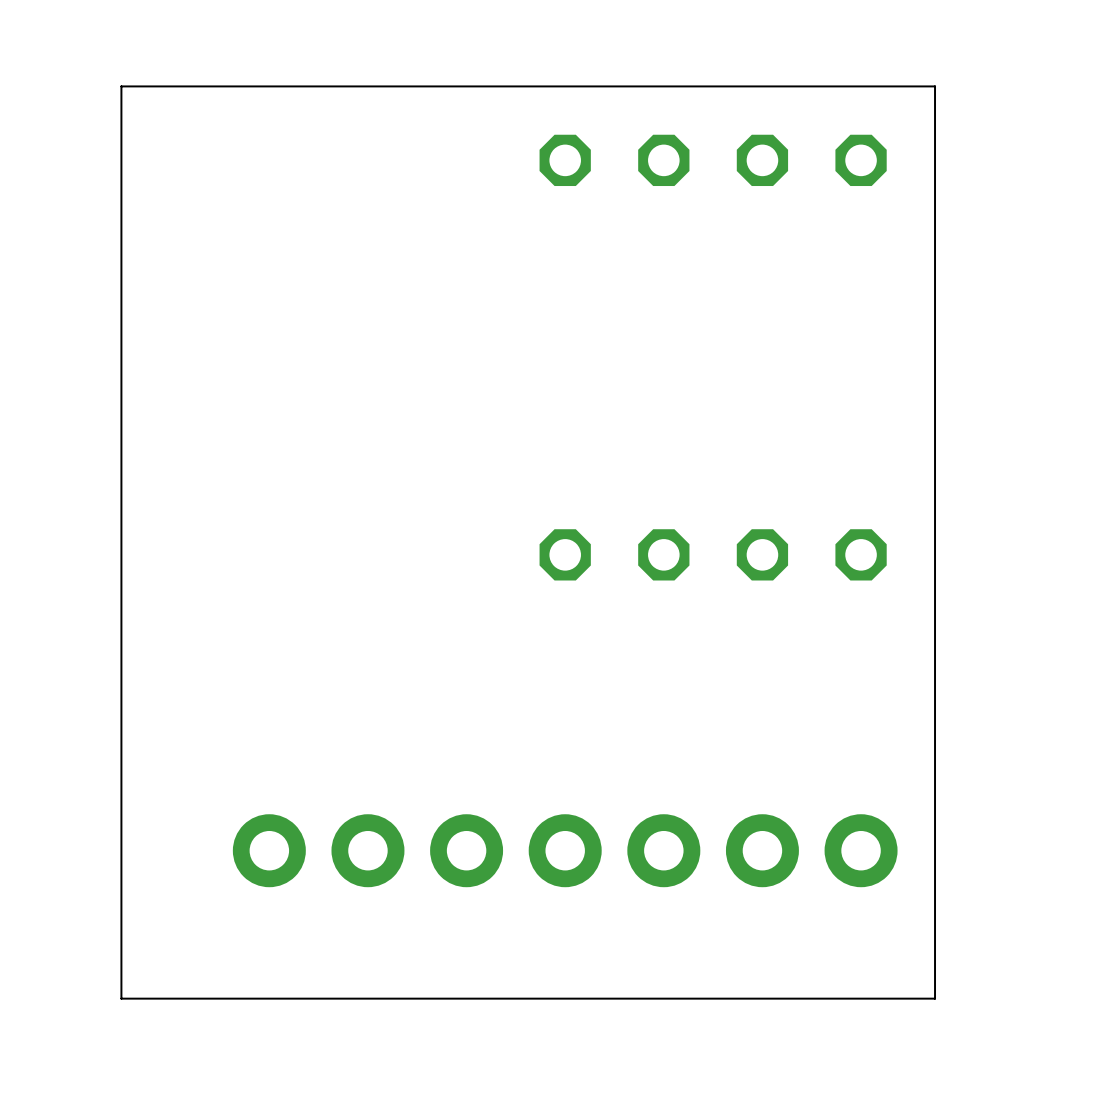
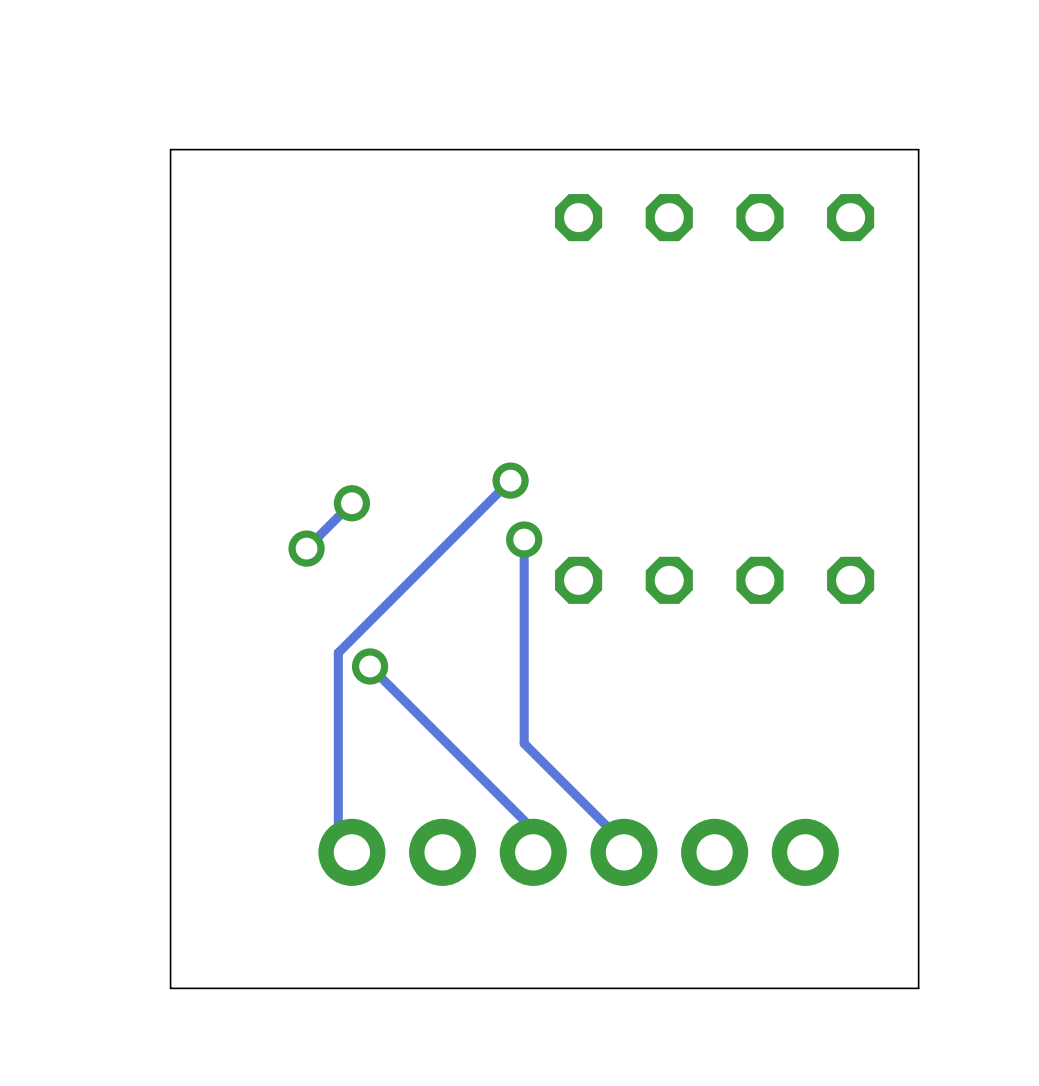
track: none -> (510, 480) (338, 652) (338, 838) (351, 852)
via: none -> (510, 480)
track: none -> (351, 503) (306, 548)
via: none -> (351, 503)
track: none -> (524, 539) (524, 743) (623, 843) (623, 852)
via: none -> (524, 539)
via: none -> (306, 548)
track: none -> (370, 666) (533, 829) (533, 852)
via: none -> (370, 666)
part footprint: [627, 814, 898, 888] -> [681, 818, 839, 886]
part position: (417, 850) -> (487, 852)

